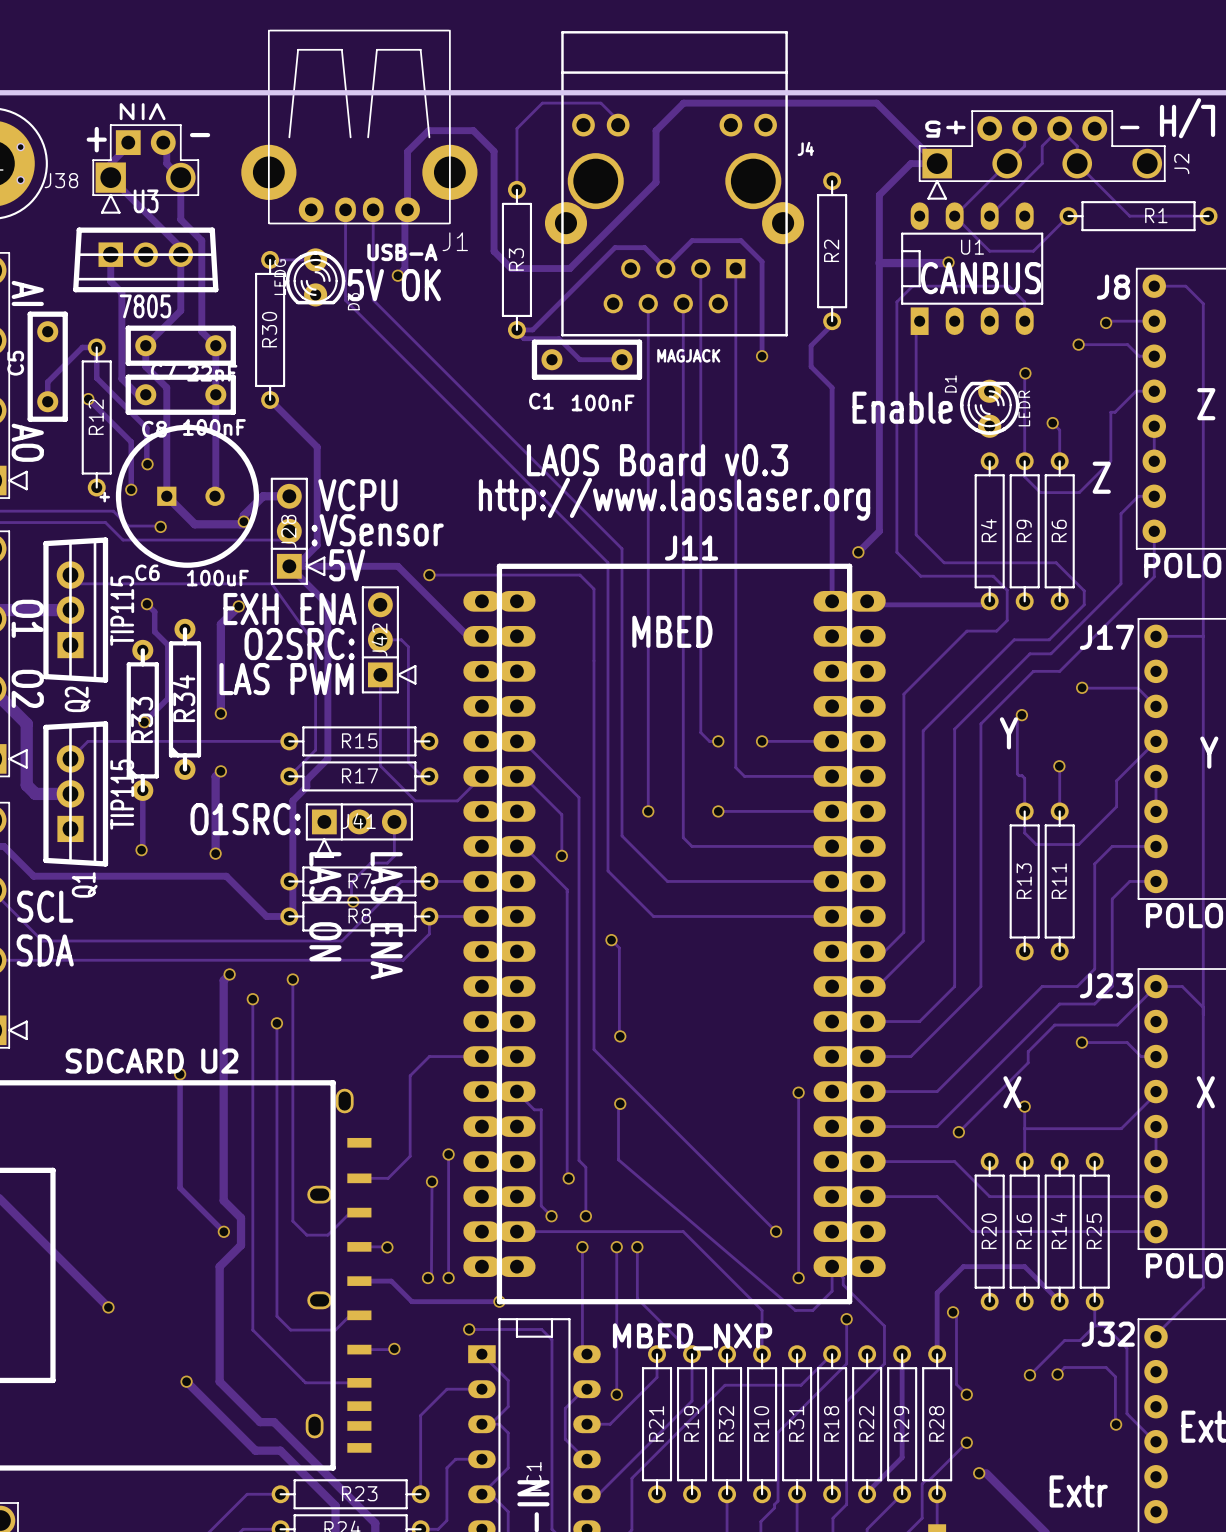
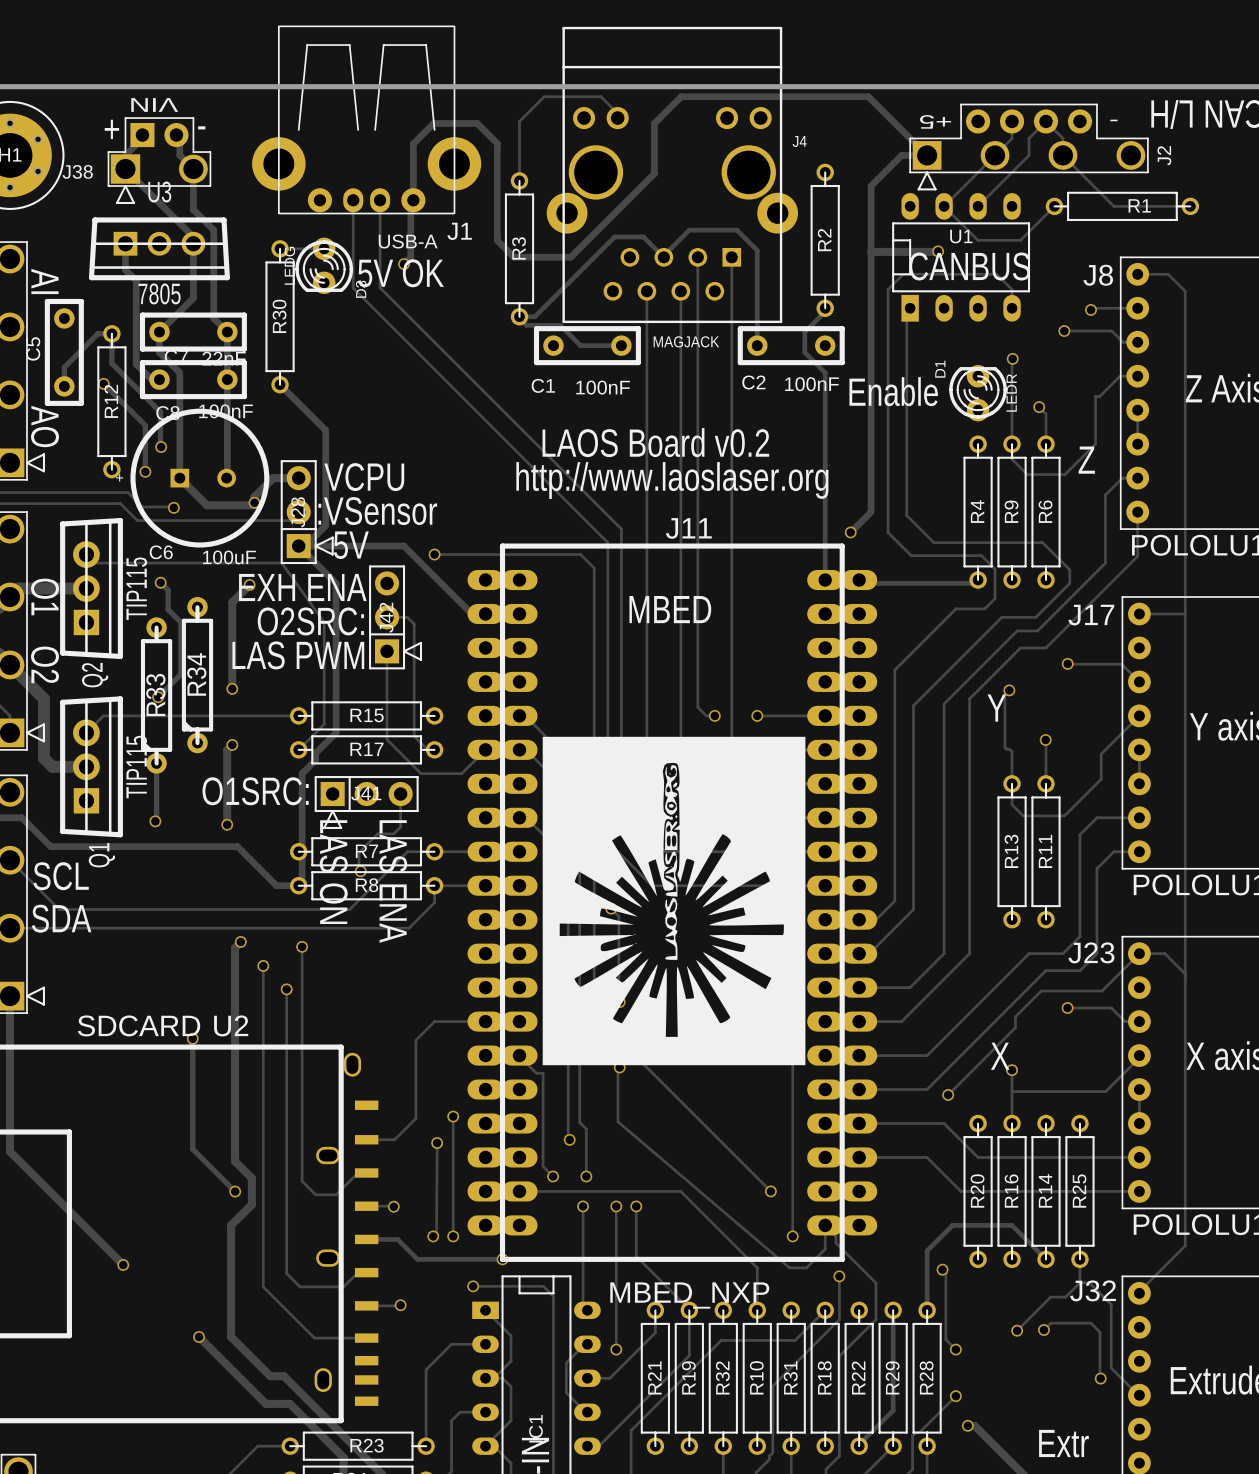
via: (762, 356) -> none
C2: none -> 100nF (791, 345)
text: LAOS Board v0.3 (657, 460) -> LAOS Board v0.2 (655, 442)
drawing: none -> [542, 736, 806, 1066]

